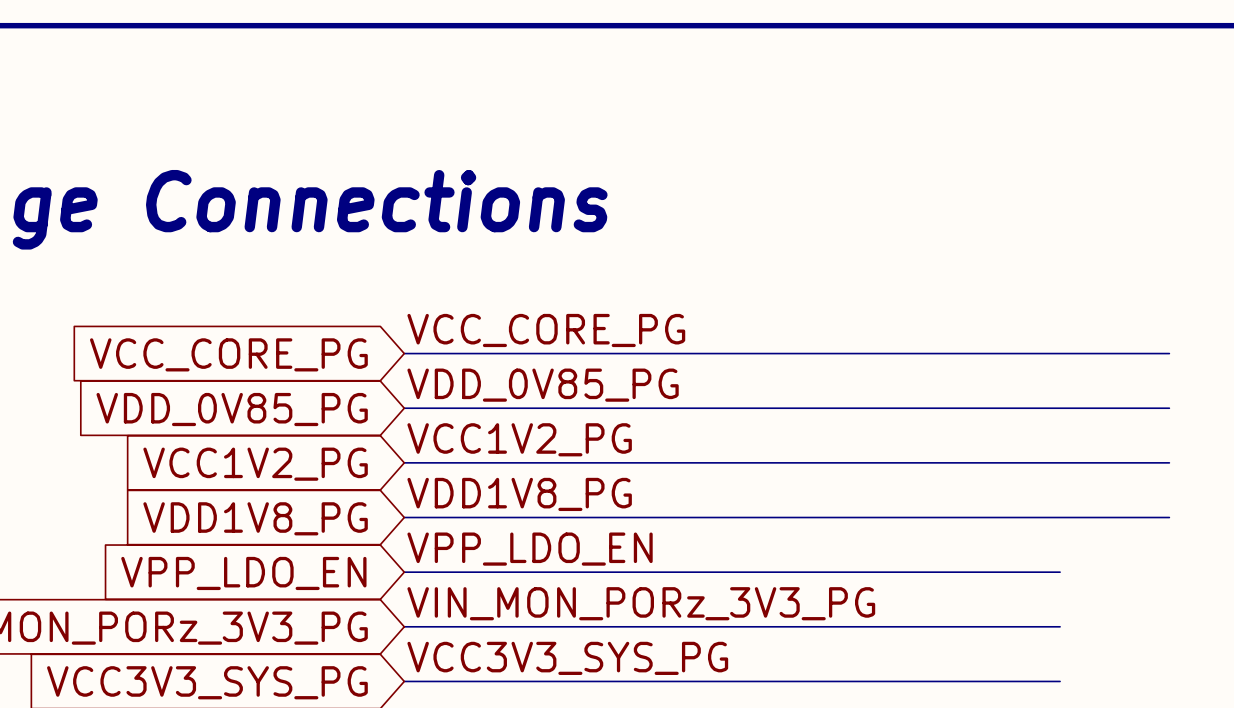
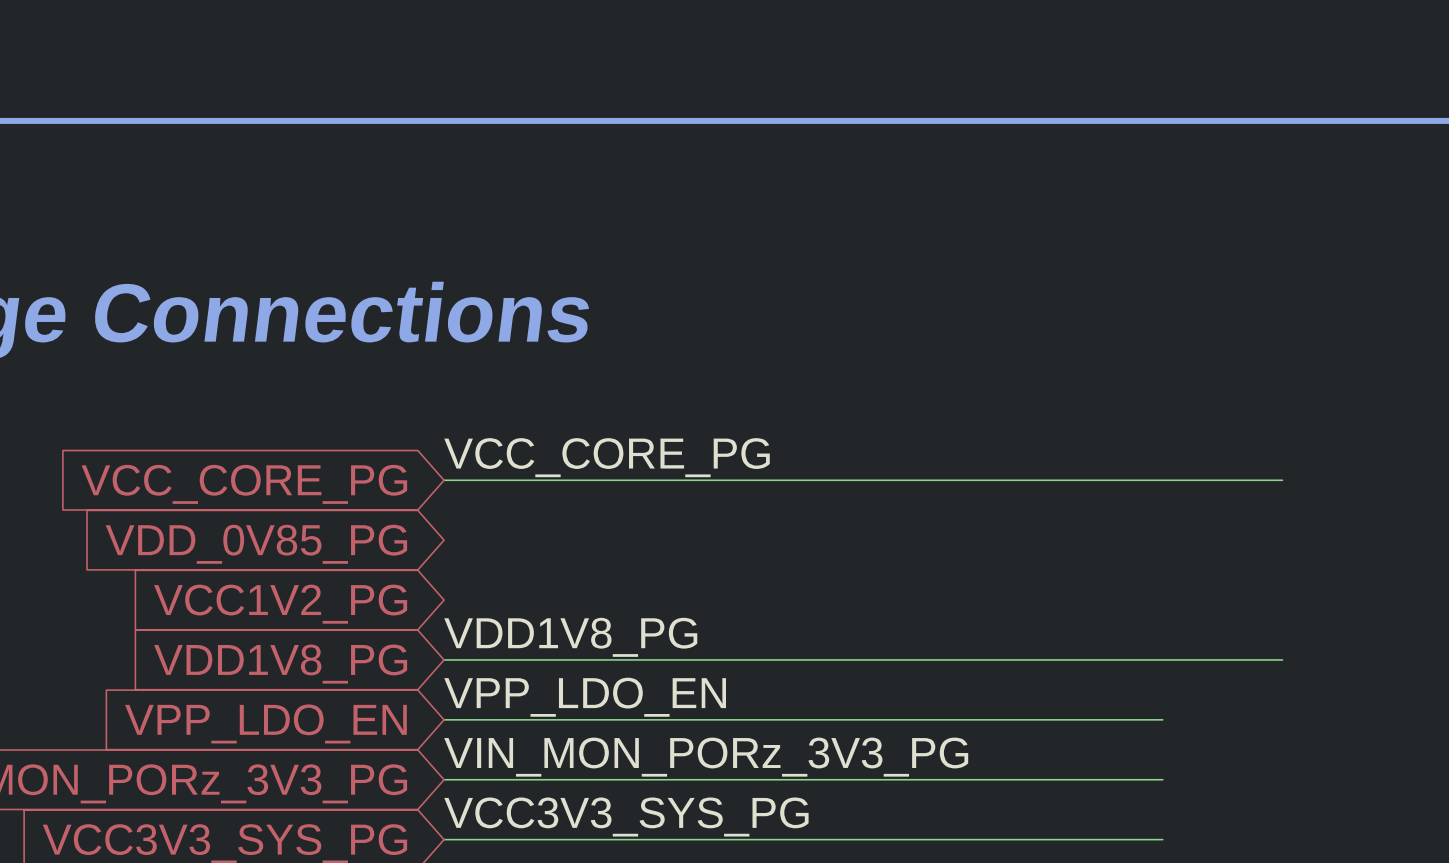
label: VDD_0V85_PG (543, 385) -> none
wire: (404, 408) (1169, 408) -> none
label: VCC1V2_PG (519, 439) -> none
wire: (404, 462) (1169, 462) -> none

